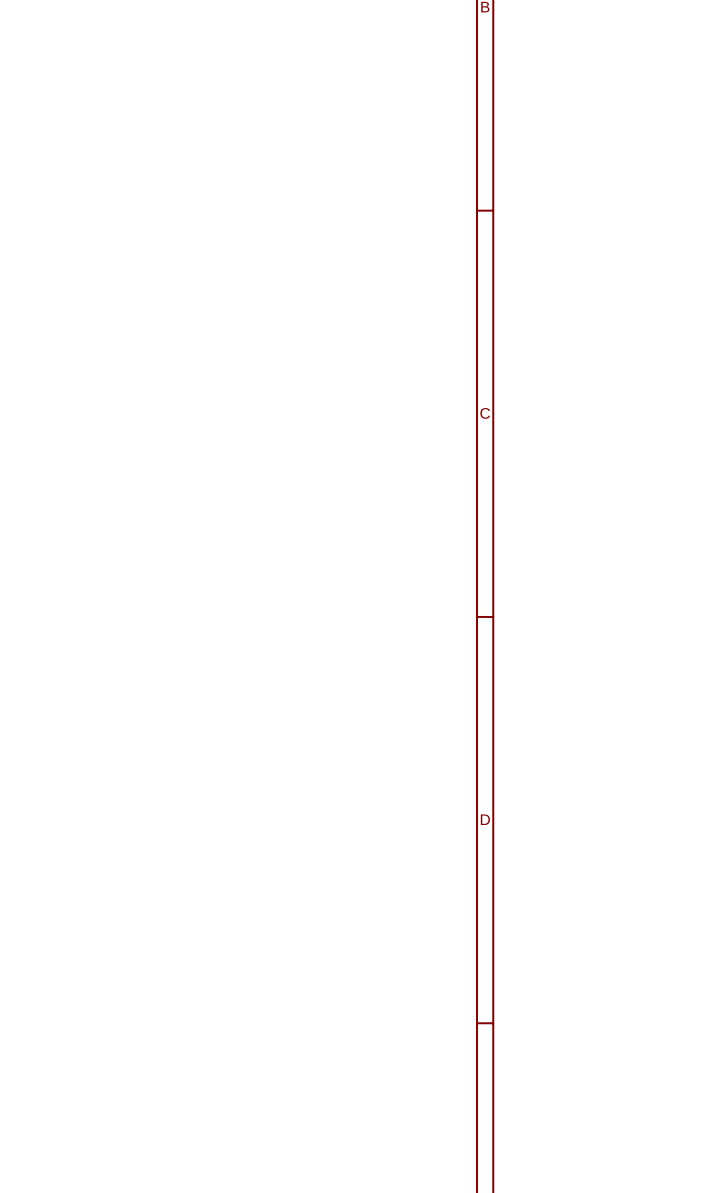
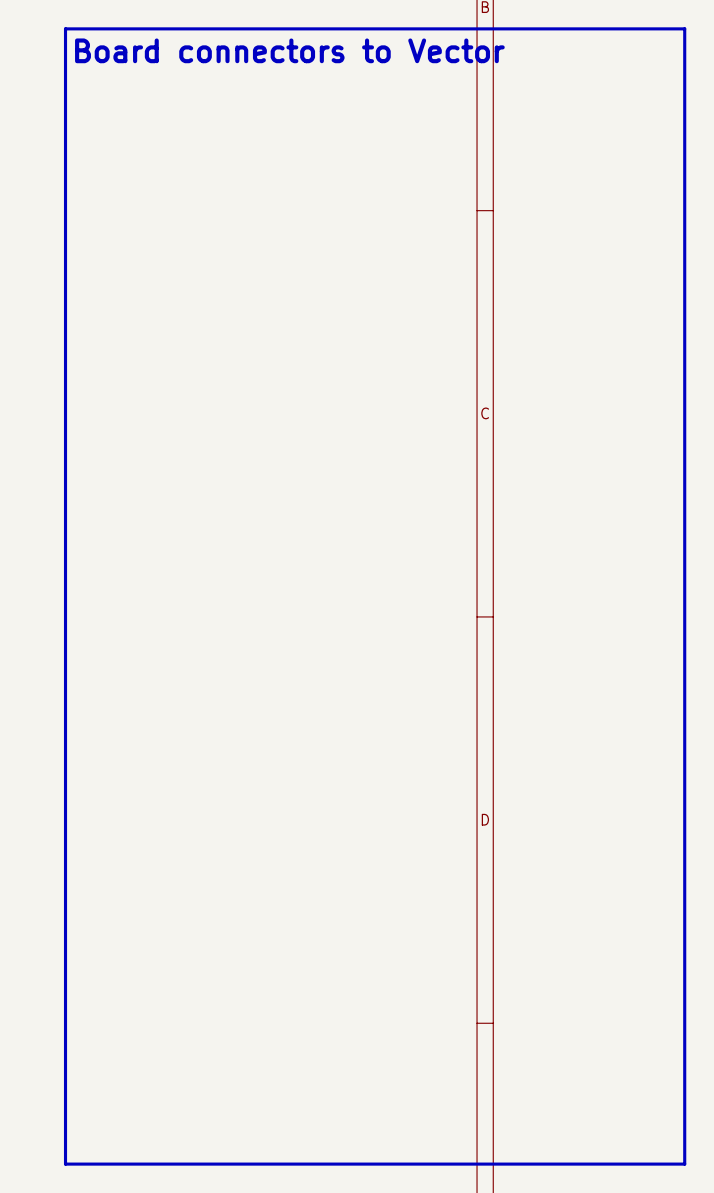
line: none -> (65, 28) (684, 28) (684, 1164) (65, 1164) (65, 28)
text: none -> Board connectors to Vector (289, 50)

